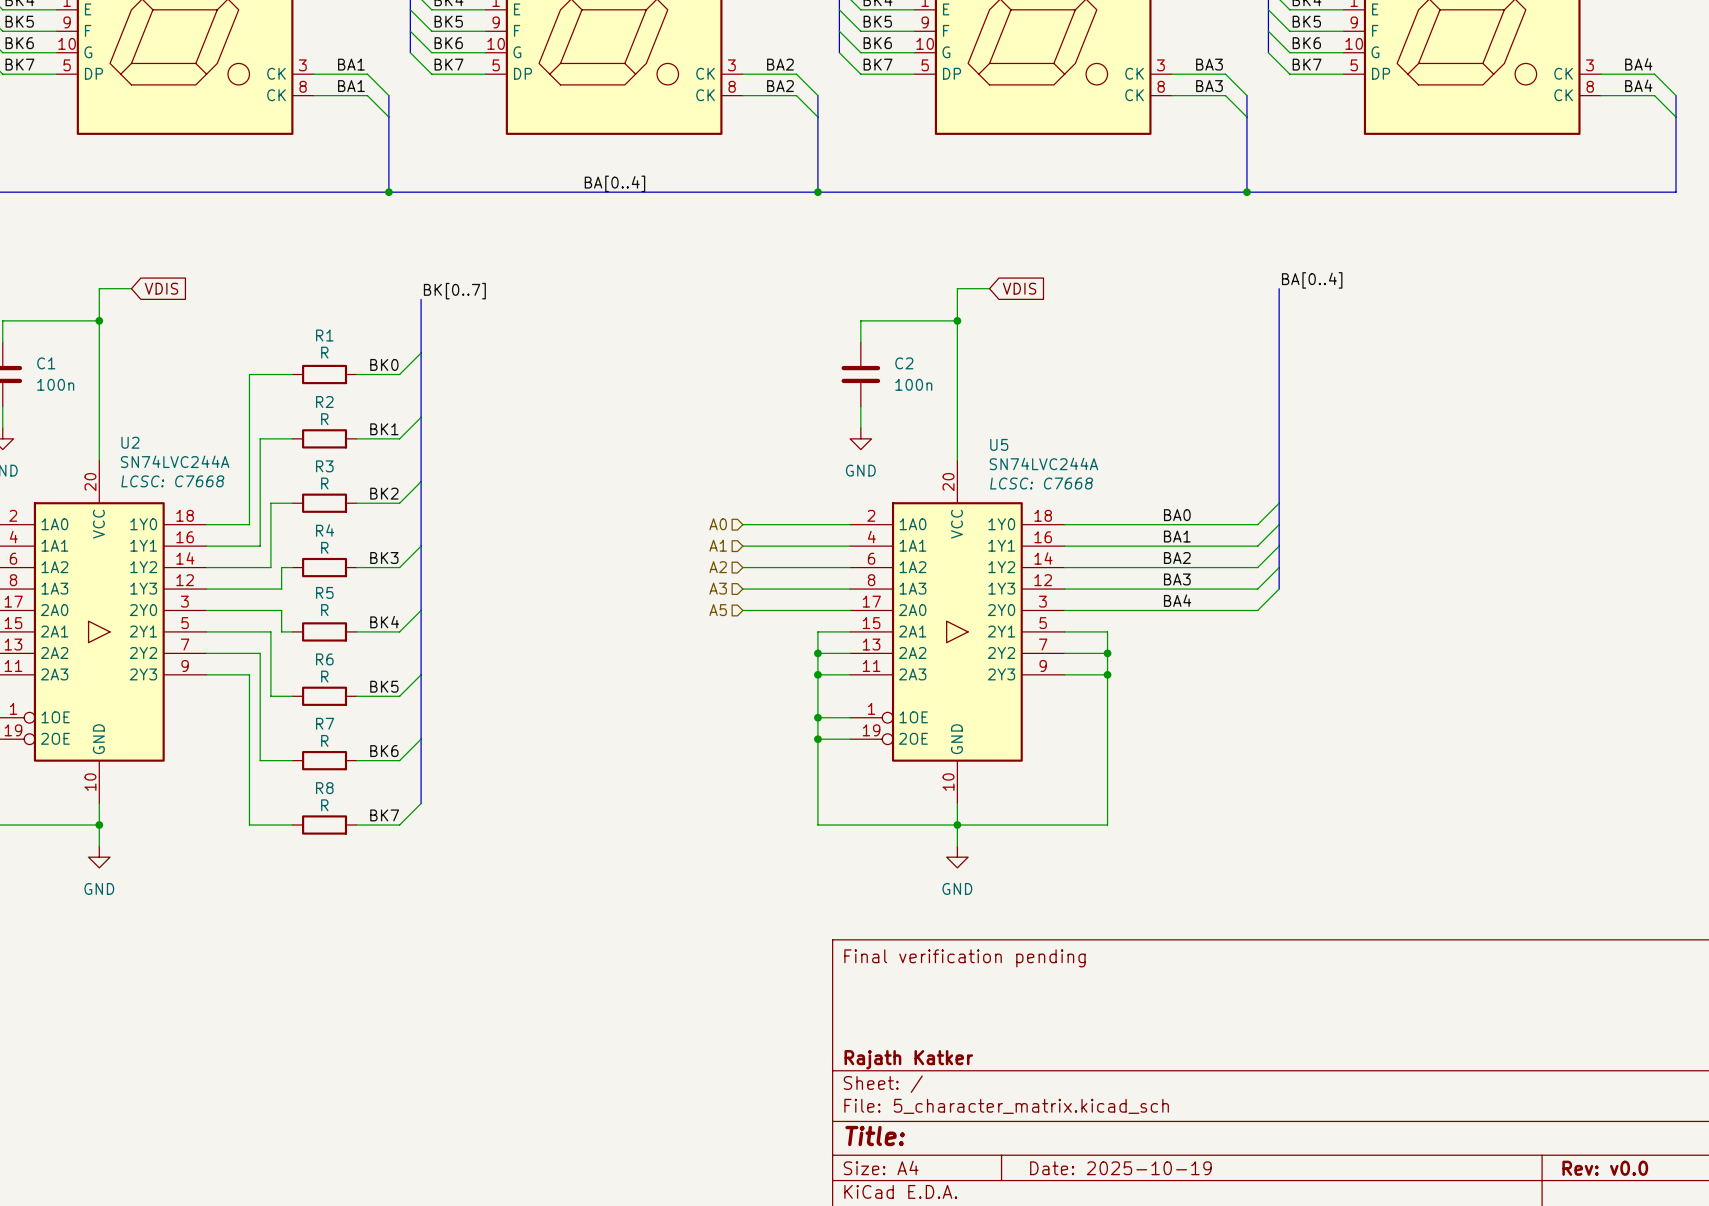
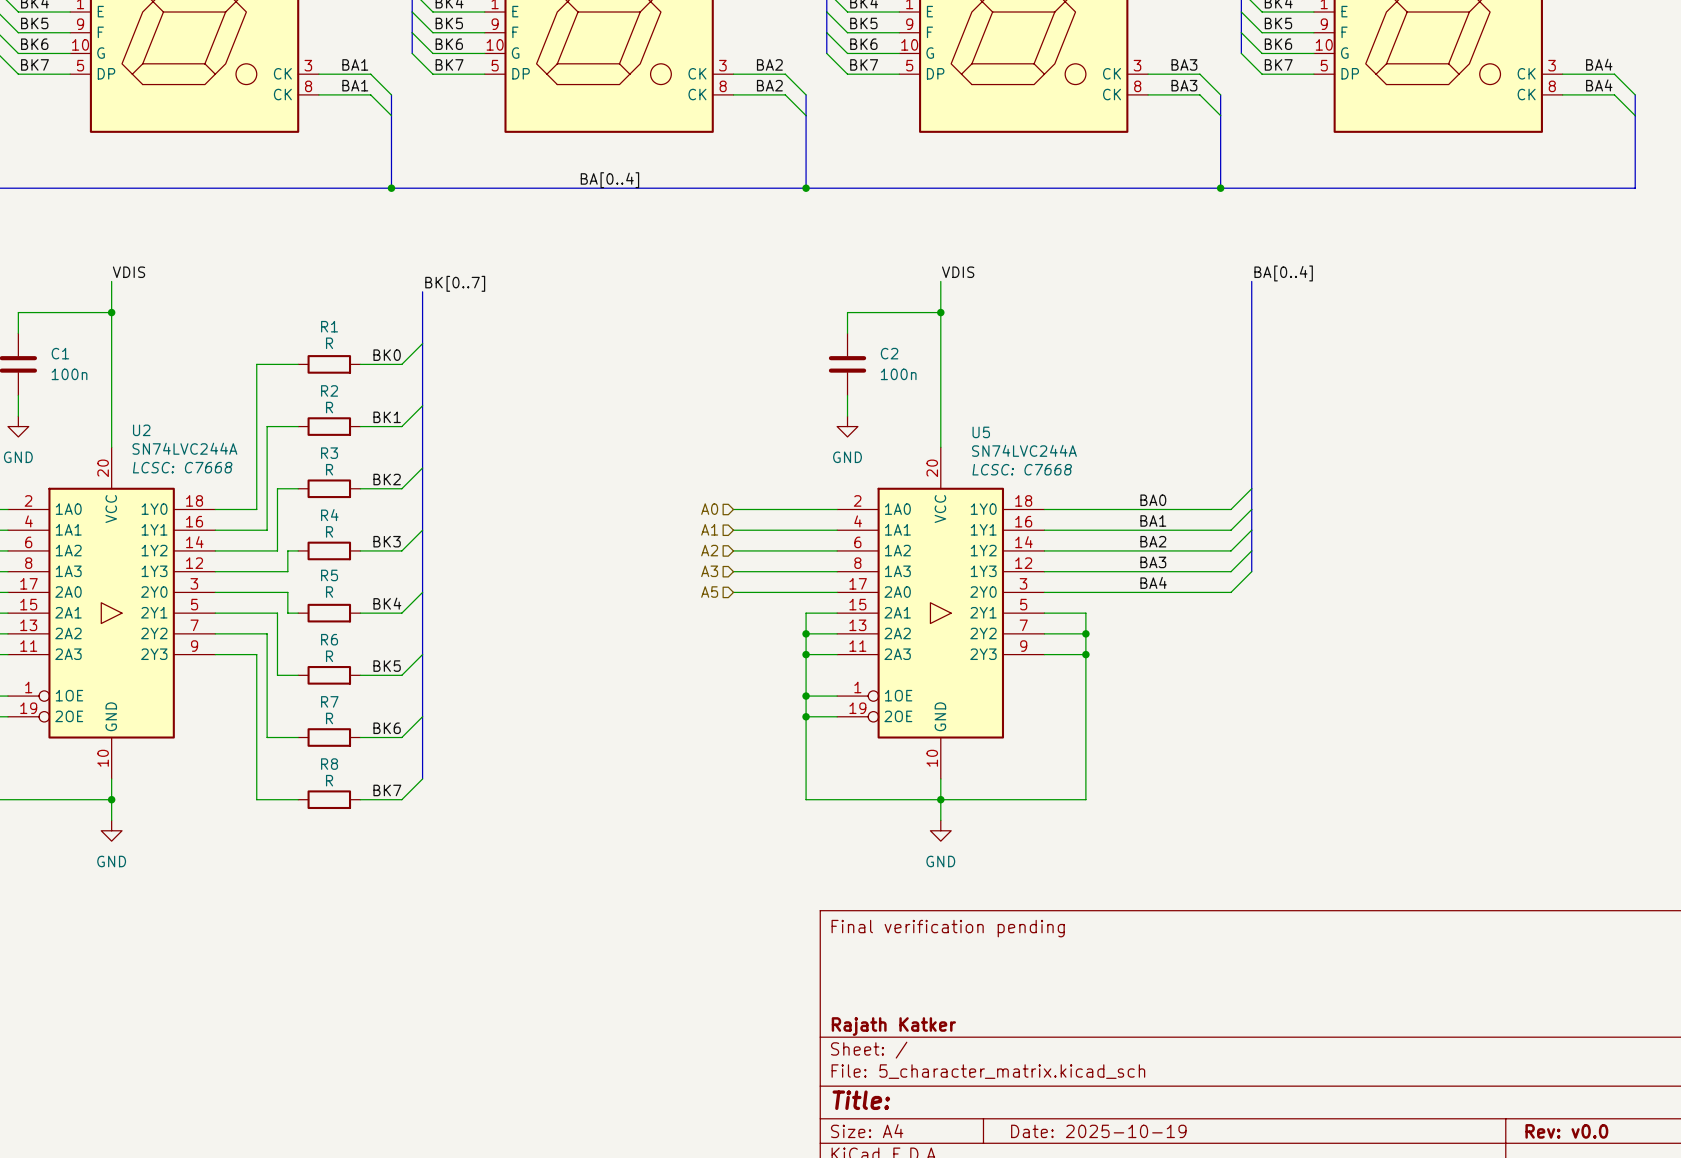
label: none -> VDIS (128, 272)
label: none -> VDIS (958, 272)
wire: (99, 288) (131, 288) -> none
global label: VDIS (161, 288) -> none
wire: (957, 288) (989, 288) -> none
global label: VDIS (1019, 288) -> none

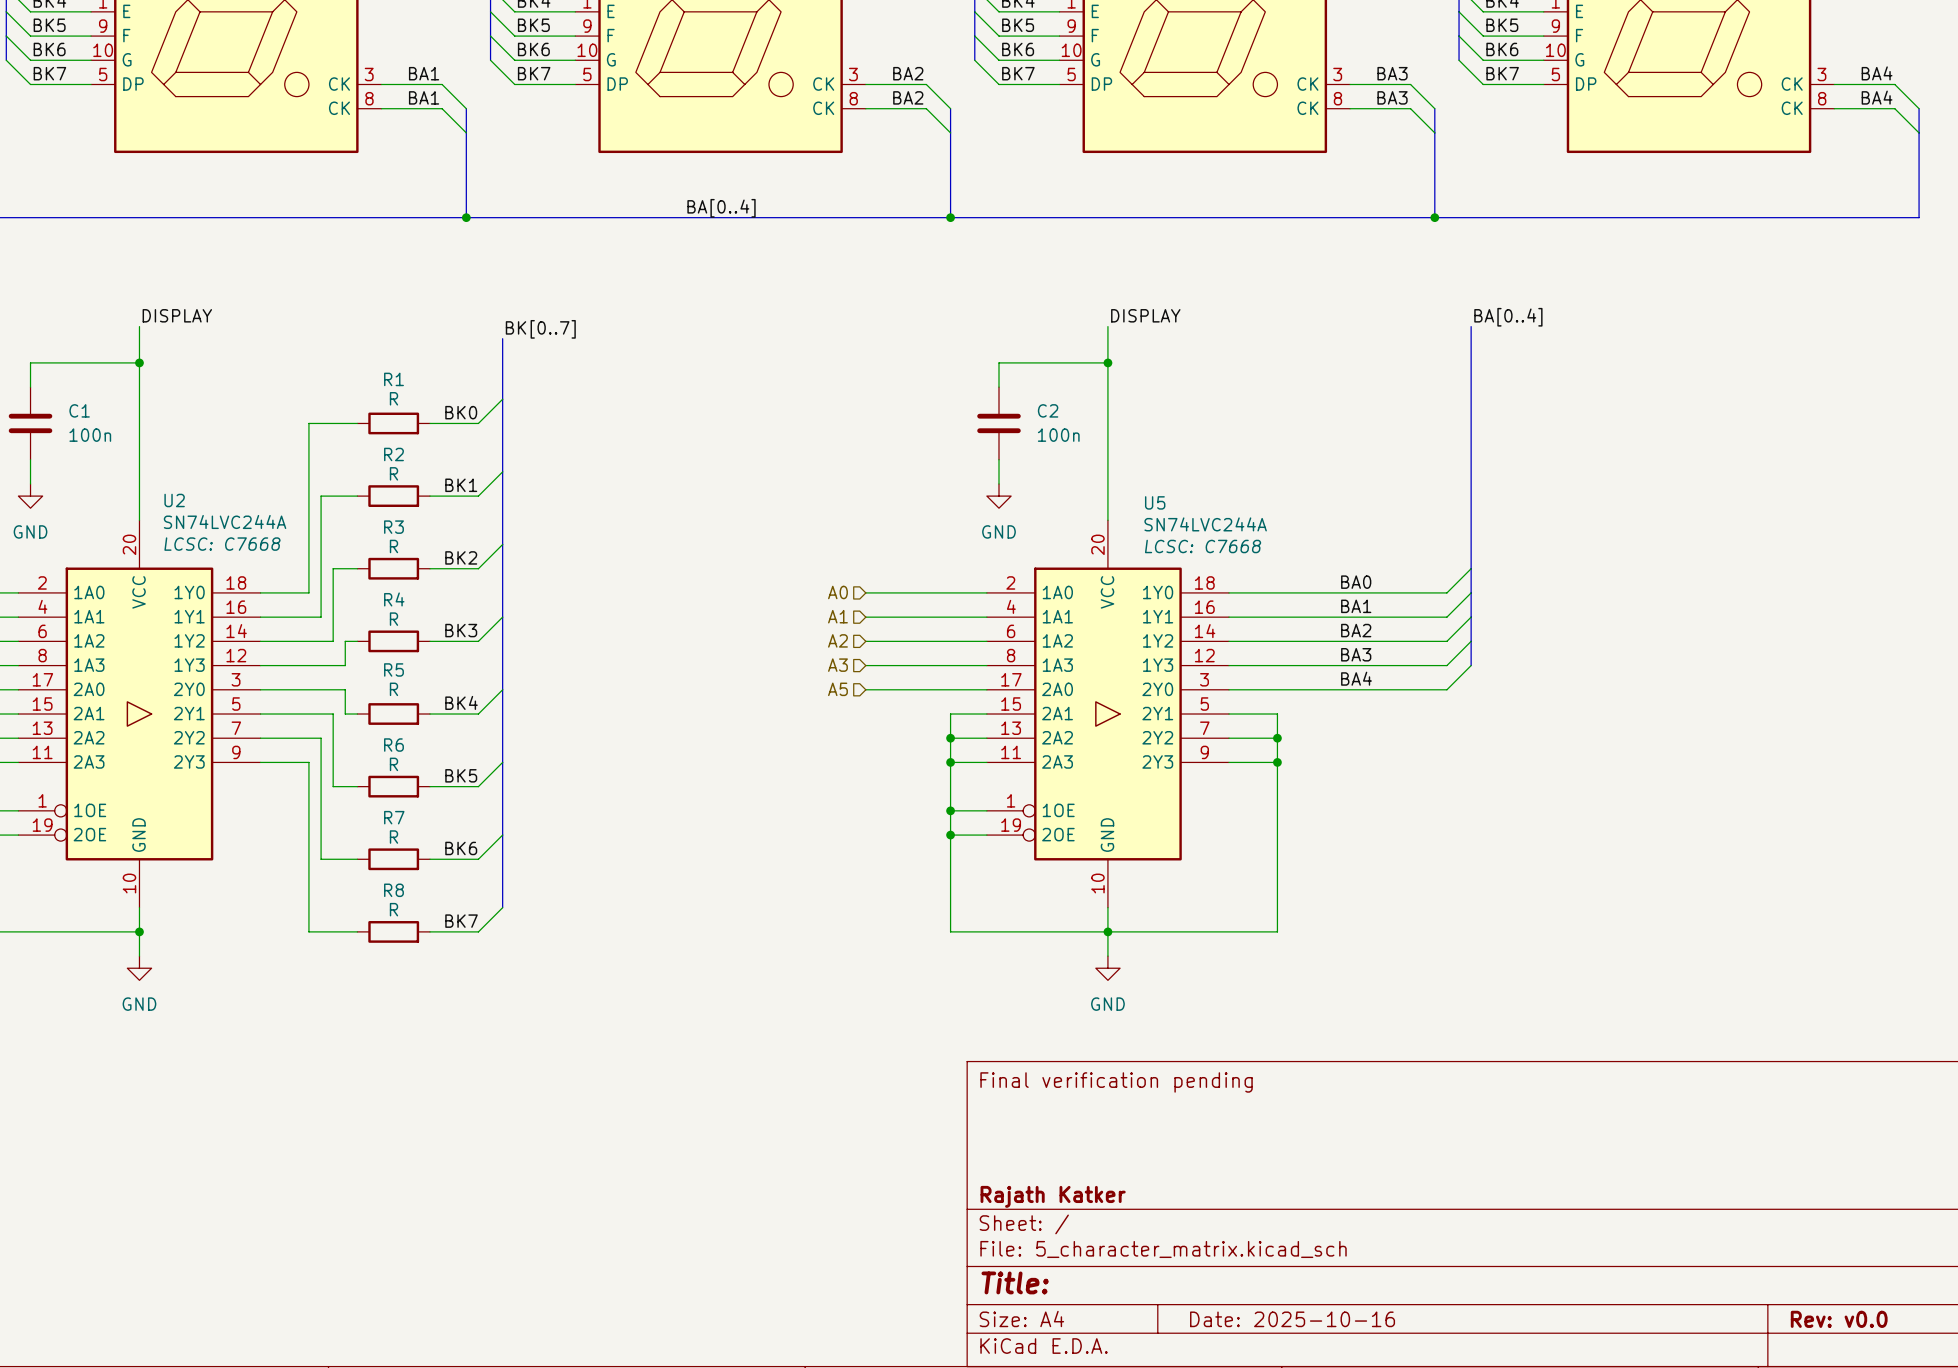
label: VDIS (128, 272) -> DISPLAY (177, 315)
label: VDIS (958, 272) -> DISPLAY (1145, 315)
title block: Date: 2025-10-19 (1098, 1131) -> Date: 2025-10-16 (1292, 1319)

